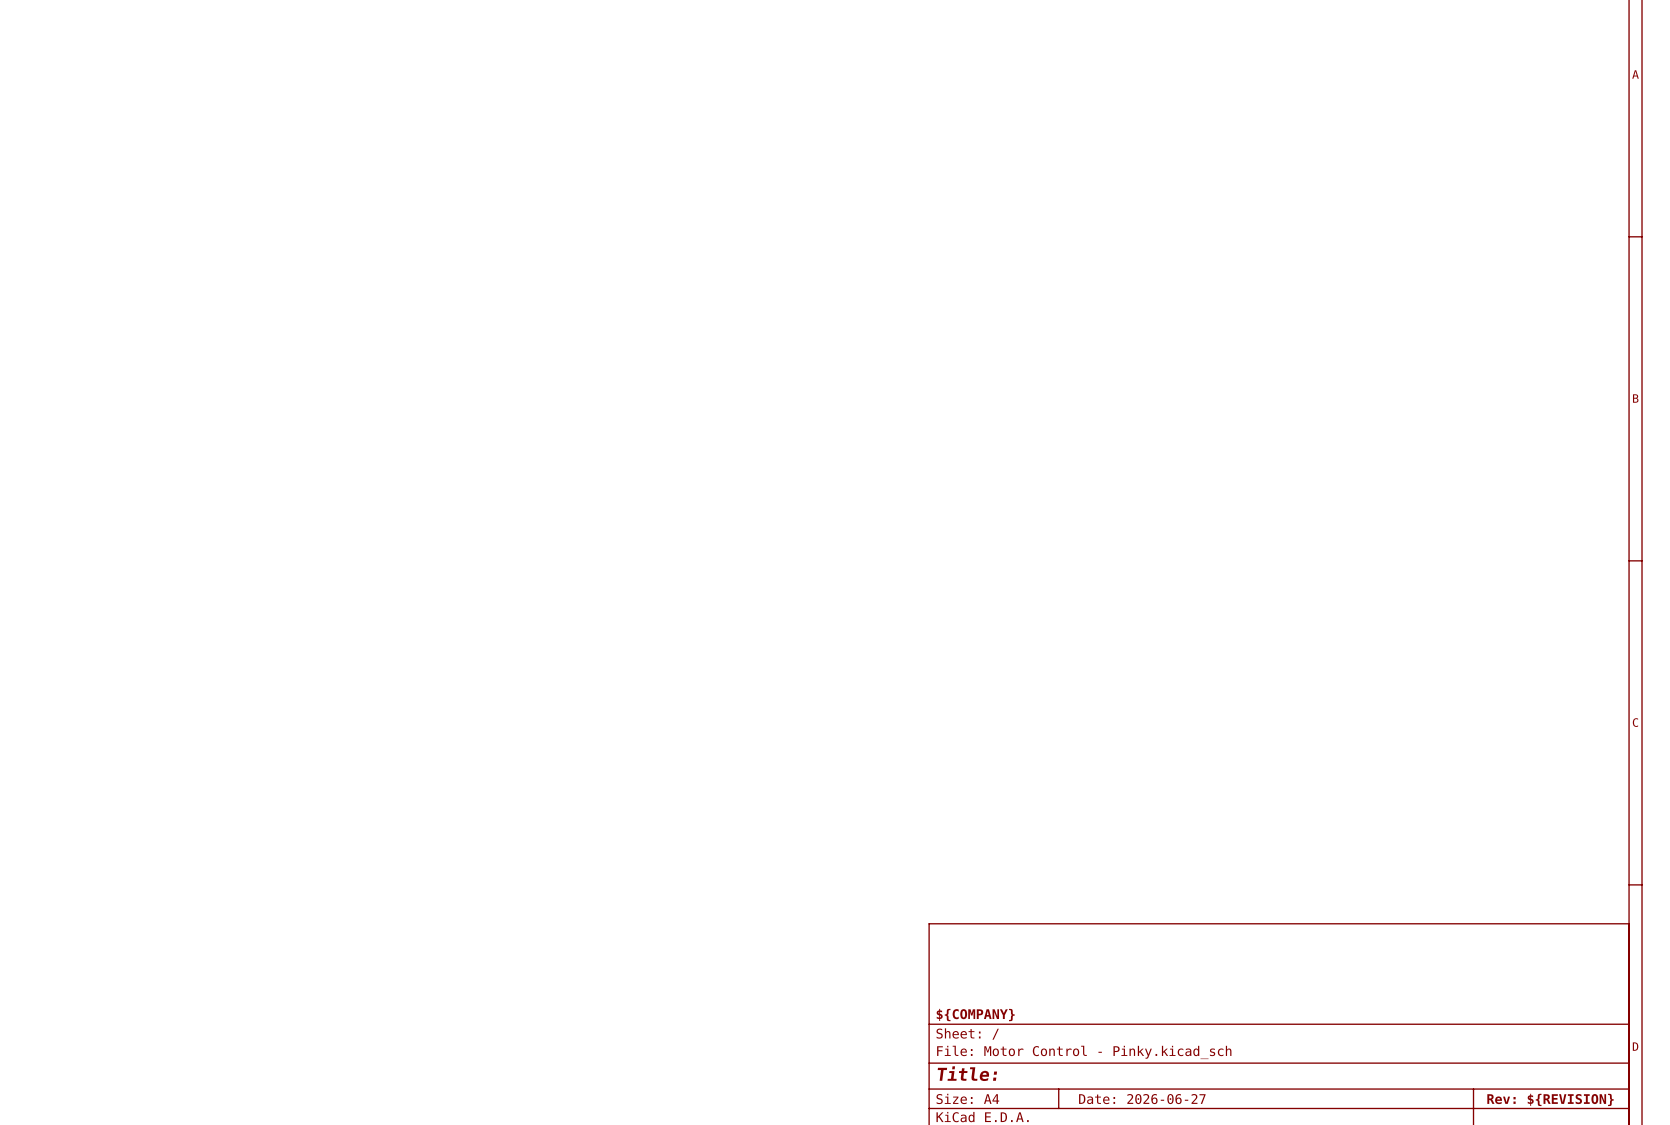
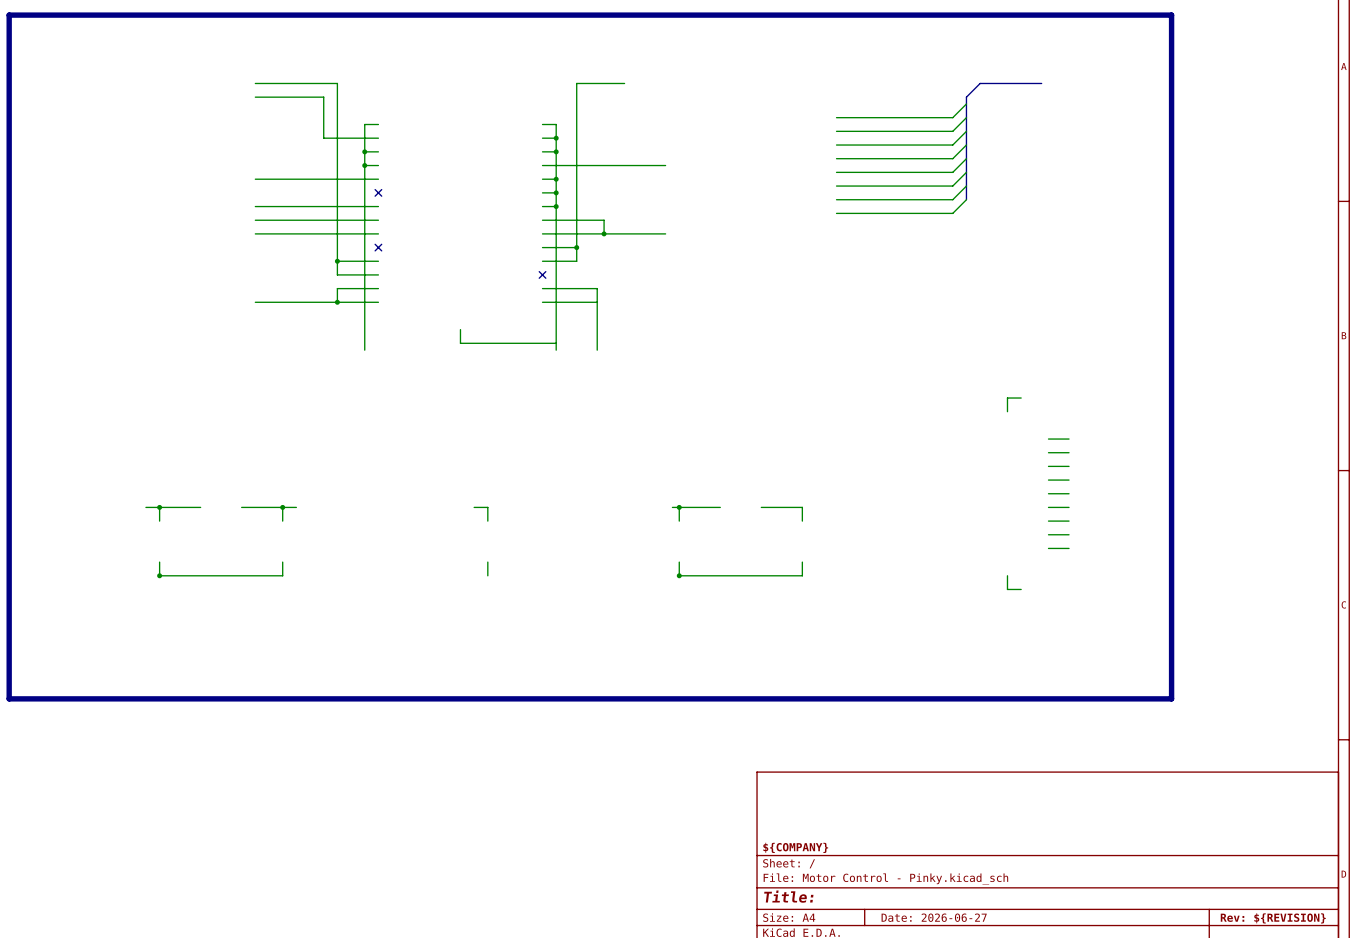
line: none -> (9, 15) (1171, 15) (1171, 698) (9, 698) (9, 15)
wire: none -> (255, 83) (337, 83) (337, 274) (378, 274)
wire: none -> (624, 83) (576, 83) (576, 261) (542, 261)
bus: none -> (1041, 83) (980, 83) (966, 97) (966, 199)
wire: none -> (255, 97) (323, 97) (323, 138) (378, 138)
wire: none -> (966, 103) (952, 117) (836, 117)
wire: none -> (966, 117) (952, 131) (836, 131)
wire: none -> (378, 124) (364, 124) (364, 350)
wire: none -> (542, 124) (556, 124) (556, 350)
wire: none -> (966, 131) (952, 145) (836, 145)
wire: none -> (542, 138) (556, 138)
junction: none -> (556, 138)
wire: none -> (966, 145) (952, 158) (836, 158)
wire: none -> (364, 151) (378, 151)
junction: none -> (364, 151)
wire: none -> (542, 151) (556, 151)
junction: none -> (556, 151)
wire: none -> (966, 158) (952, 172) (836, 172)
wire: none -> (364, 165) (378, 165)
junction: none -> (364, 165)
wire: none -> (542, 165) (665, 165)
wire: none -> (966, 172) (952, 186) (836, 186)
wire: none -> (255, 179) (378, 179)
wire: none -> (542, 179) (556, 179)
junction: none -> (556, 179)
wire: none -> (966, 186) (952, 199) (836, 199)
no-connect mark: none -> (378, 192)
wire: none -> (542, 192) (556, 192)
junction: none -> (556, 192)
wire: none -> (966, 199) (952, 213) (836, 213)
wire: none -> (255, 206) (378, 206)
wire: none -> (542, 206) (556, 206)
junction: none -> (556, 206)
wire: none -> (255, 220) (378, 220)
wire: none -> (542, 220) (604, 220) (604, 233)
wire: none -> (255, 233) (378, 233)
wire: none -> (542, 233) (665, 233)
junction: none -> (604, 233)
no-connect mark: none -> (378, 247)
wire: none -> (542, 247) (576, 247)
junction: none -> (576, 247)
wire: none -> (337, 261) (378, 261)
junction: none -> (337, 261)
no-connect mark: none -> (542, 274)
wire: none -> (378, 288) (337, 288) (337, 302)
wire: none -> (542, 288) (597, 288) (597, 350)
wire: none -> (255, 302) (378, 302)
junction: none -> (337, 302)
wire: none -> (542, 302) (597, 302)
wire: none -> (460, 329) (460, 343) (556, 343)
wire: none -> (1021, 398) (1007, 398) (1007, 411)
wire: none -> (1048, 439) (1069, 439)
wire: none -> (1048, 452) (1069, 452)
wire: none -> (1048, 466) (1069, 466)
wire: none -> (1048, 480) (1069, 480)
wire: none -> (1048, 493) (1069, 493)
wire: none -> (145, 507) (200, 507)
wire: none -> (159, 507) (159, 521)
junction: none -> (159, 507)
wire: none -> (241, 507) (296, 507)
wire: none -> (282, 507) (282, 521)
junction: none -> (282, 507)
wire: none -> (474, 507) (487, 507) (487, 521)
wire: none -> (672, 507) (720, 507)
wire: none -> (679, 507) (679, 521)
junction: none -> (679, 507)
wire: none -> (761, 507) (802, 507) (802, 521)
wire: none -> (1048, 507) (1069, 507)
wire: none -> (1048, 521) (1069, 521)
wire: none -> (1048, 534) (1069, 534)
wire: none -> (1048, 548) (1069, 548)
wire: none -> (159, 562) (159, 575) (282, 575) (282, 562)
wire: none -> (487, 562) (487, 575)
wire: none -> (679, 562) (679, 575) (802, 575) (802, 562)
junction: none -> (159, 575)
junction: none -> (679, 575)
wire: none -> (1007, 575) (1007, 589) (1021, 589)

